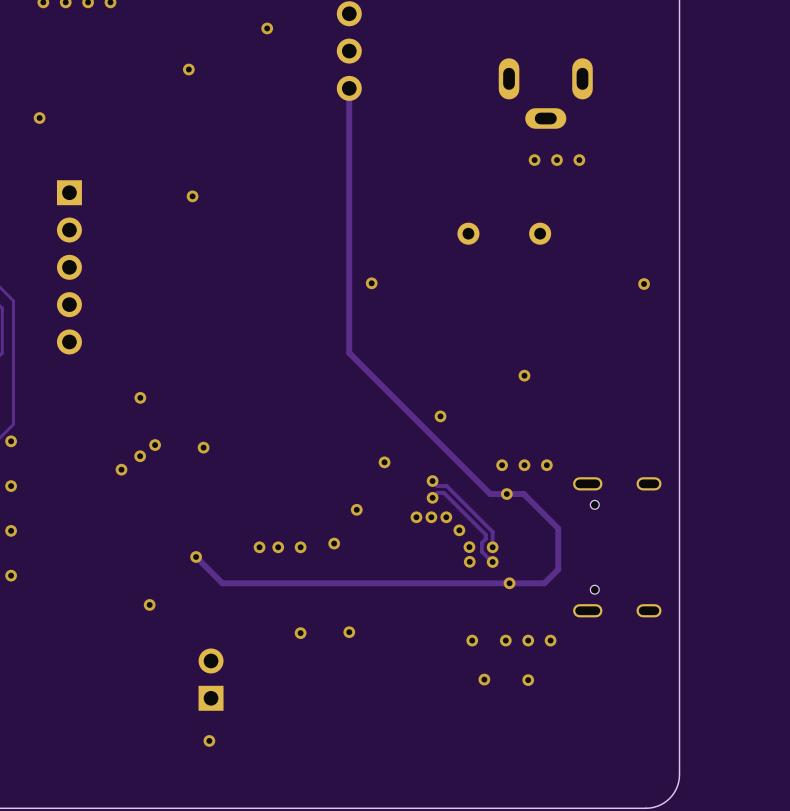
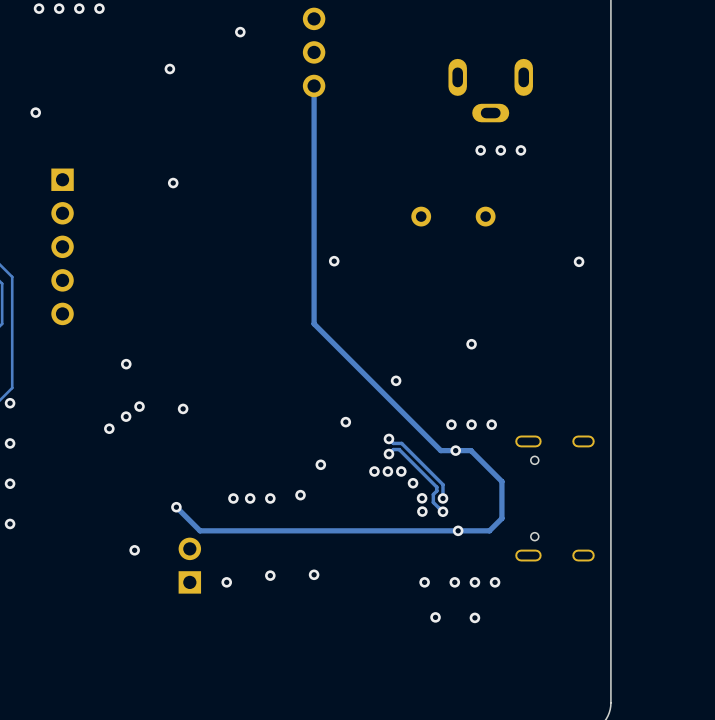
via: none -> (226, 582)
part position: (211, 679) -> (189, 565)
via: (209, 740) -> none

